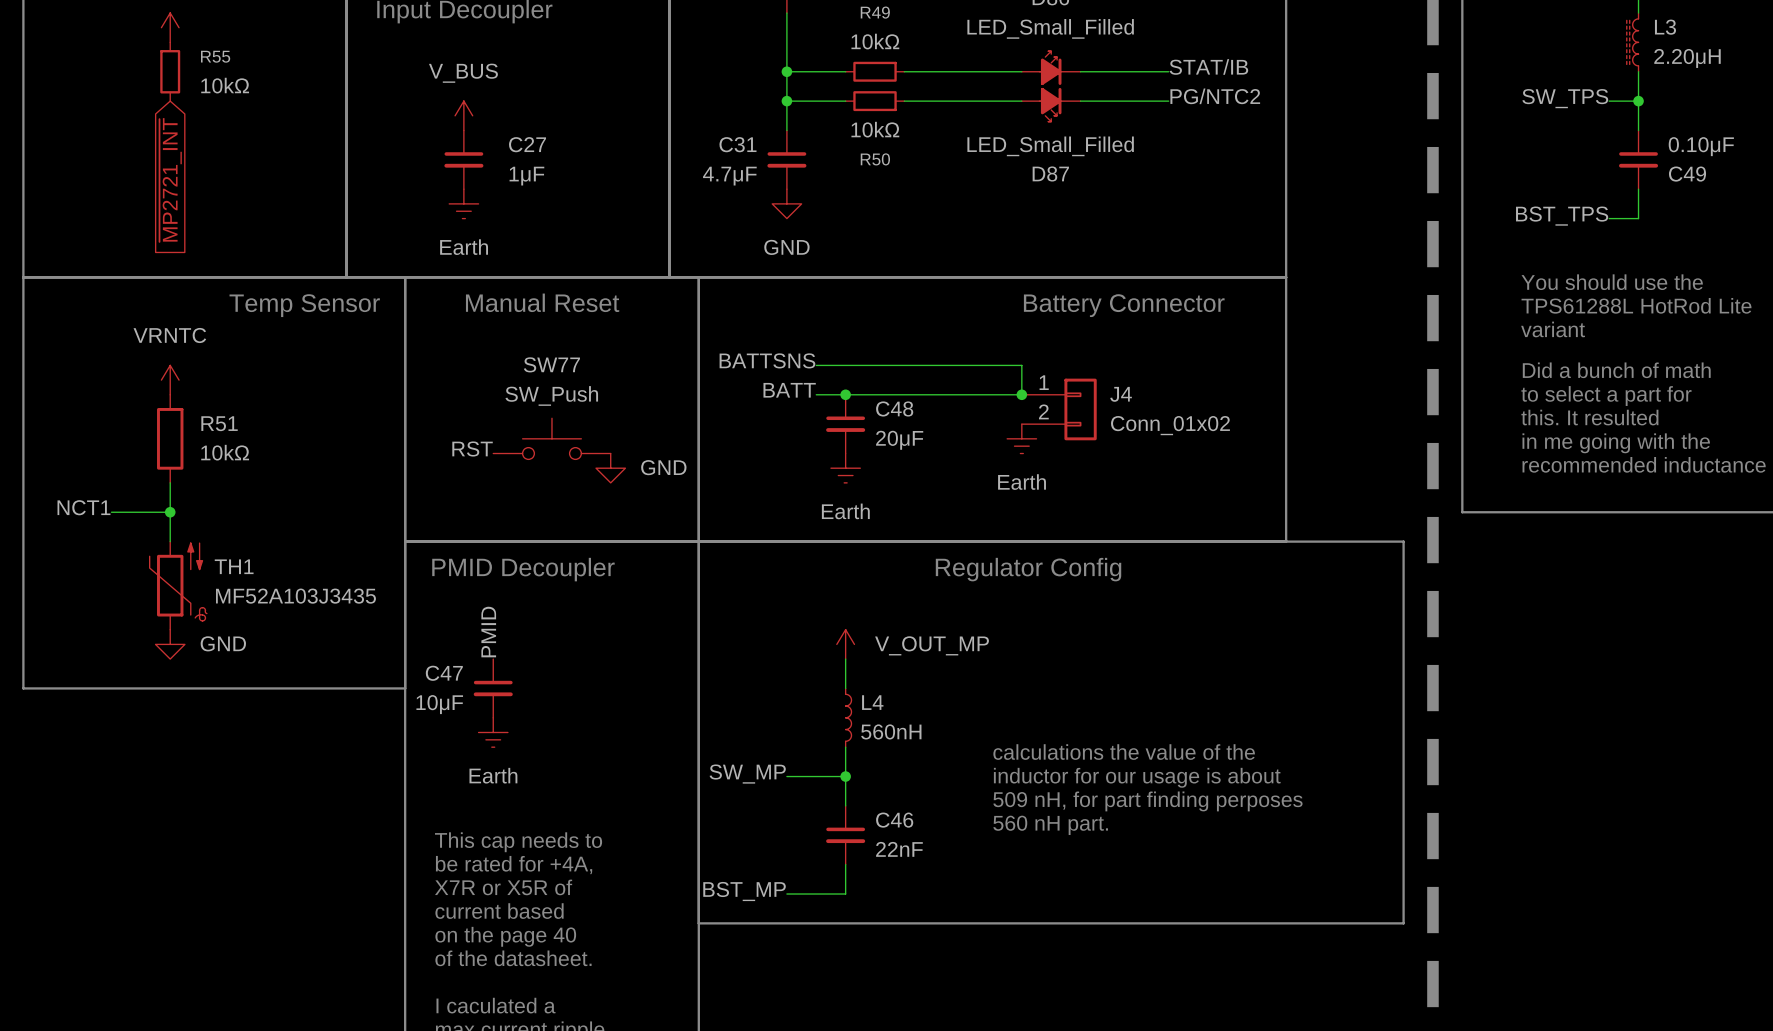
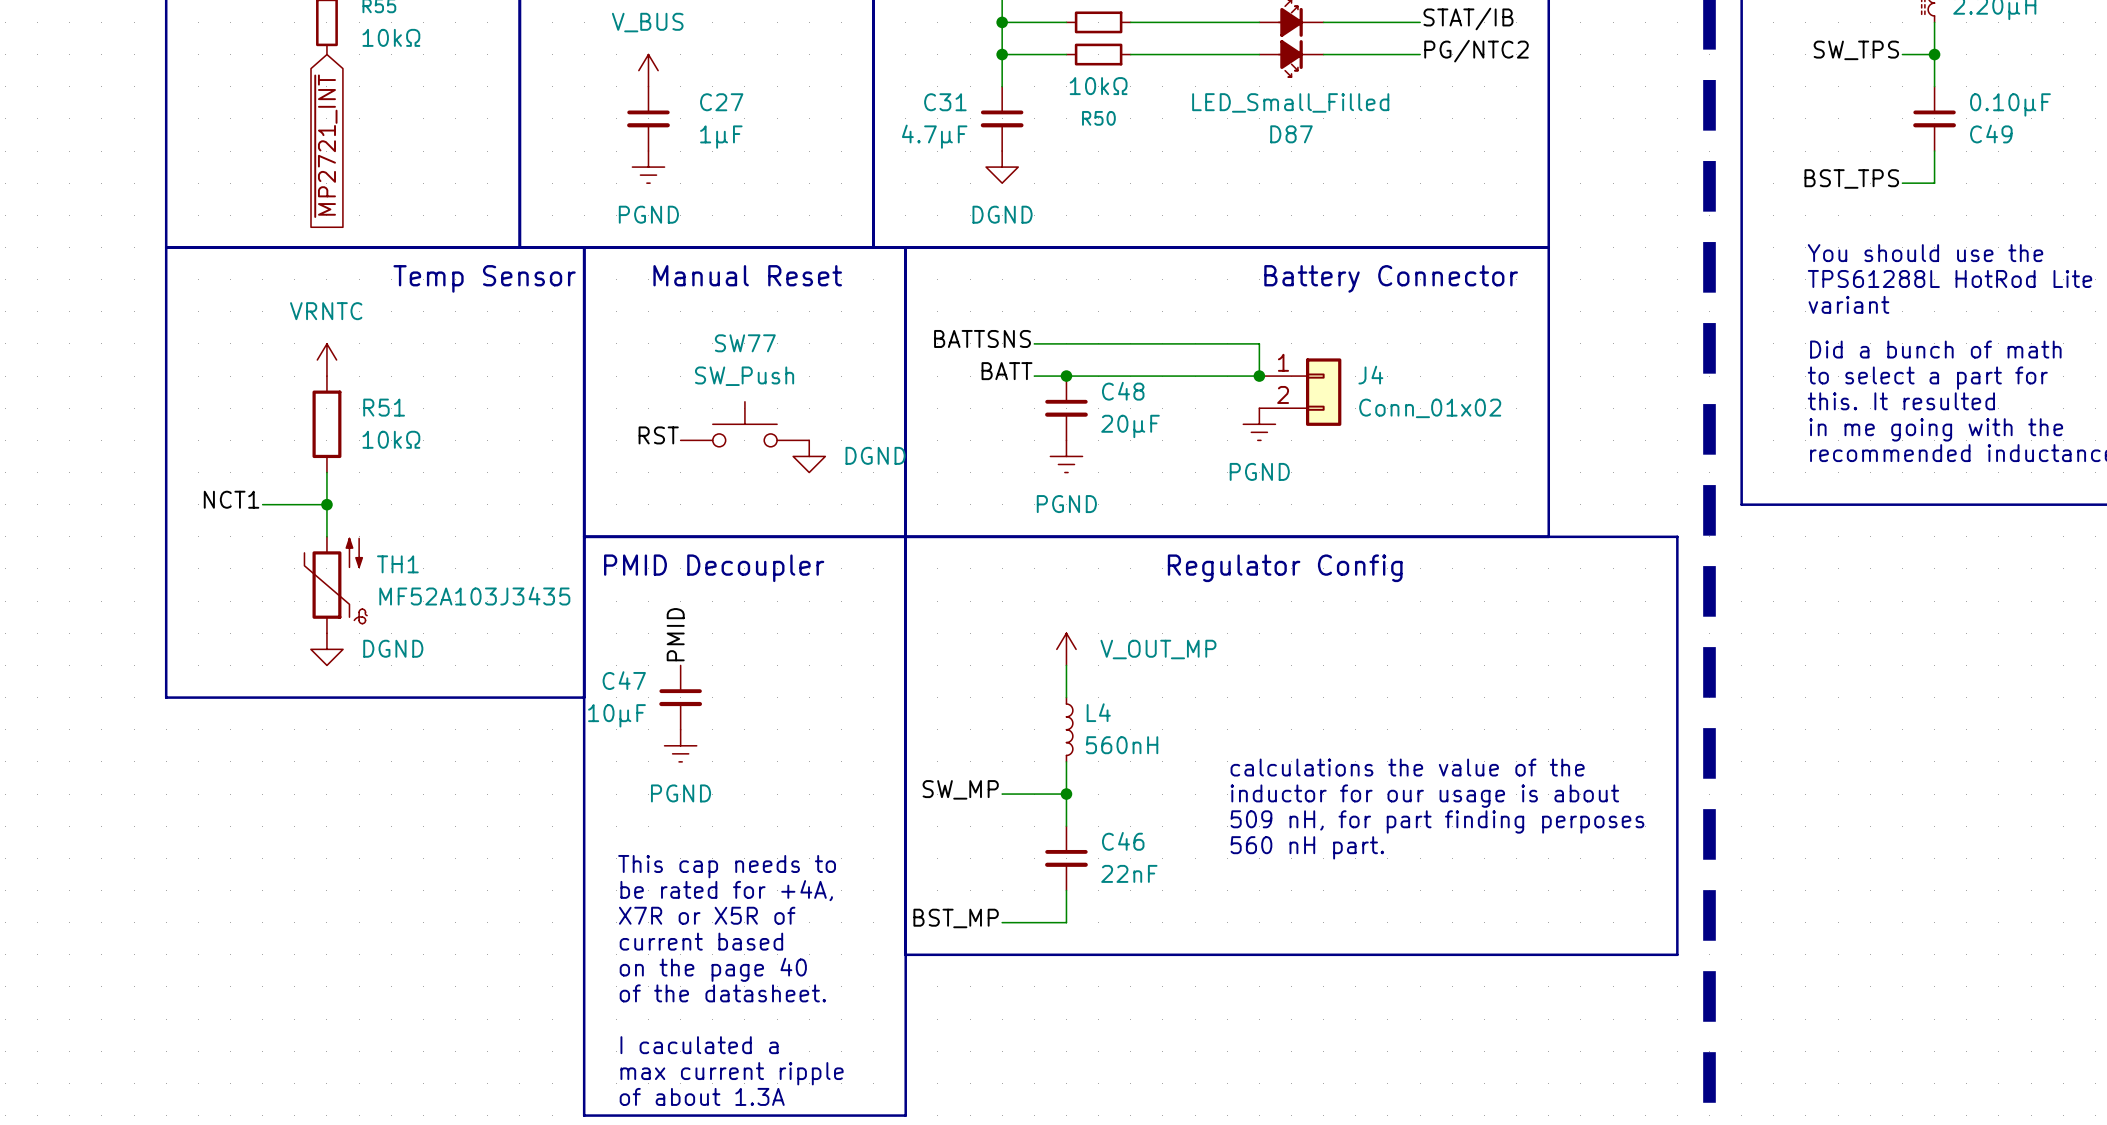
power symbol: Earth (463, 203) -> PGND (648, 167)
power symbol: GND (786, 203) -> DGND (1002, 167)
power symbol: Earth (1021, 438) -> PGND (1259, 424)
power symbol: GND (610, 468) -> DGND (809, 456)
power symbol: Earth (845, 468) -> PGND (1066, 456)
power symbol: GND (170, 644) -> DGND (326, 649)
power symbol: Earth (493, 732) -> PGND (680, 745)

